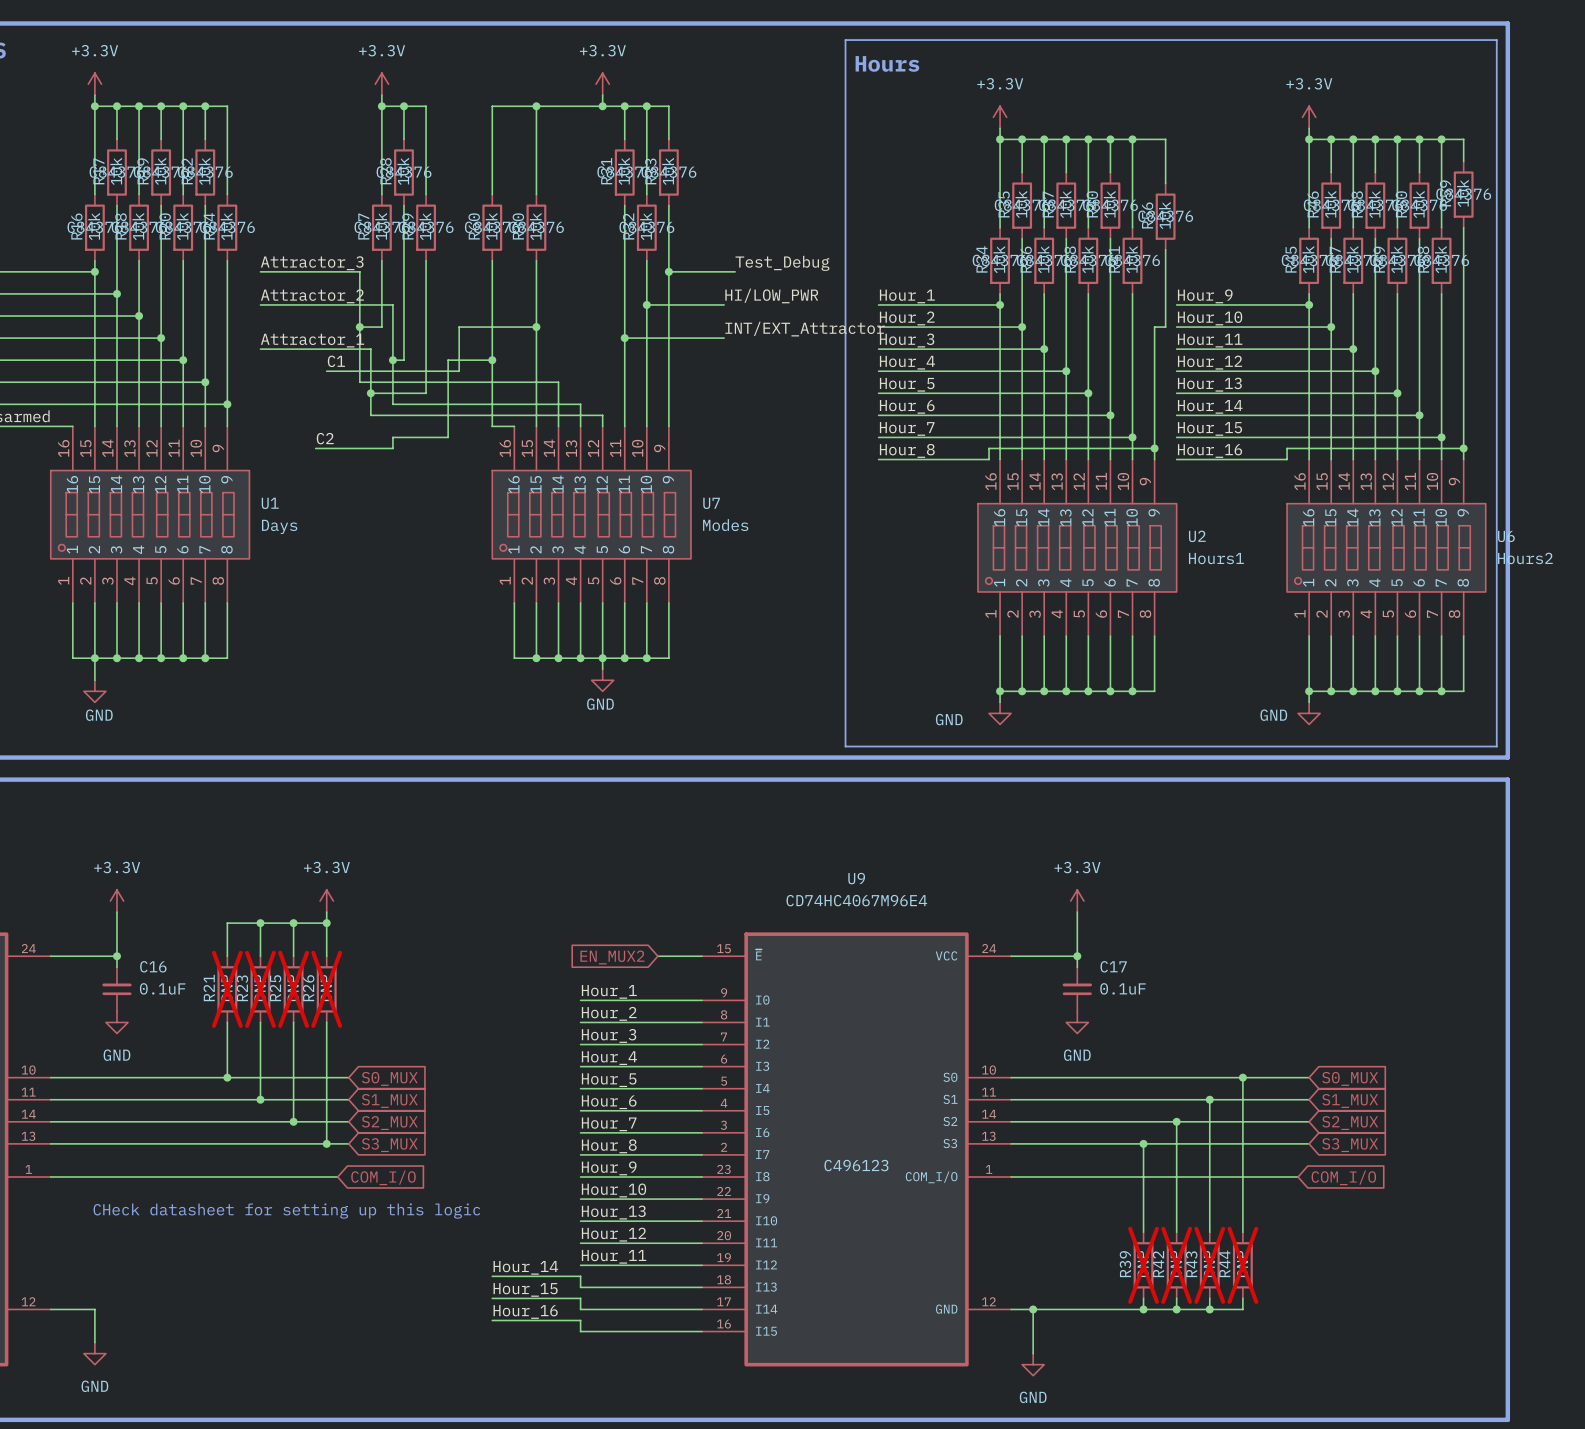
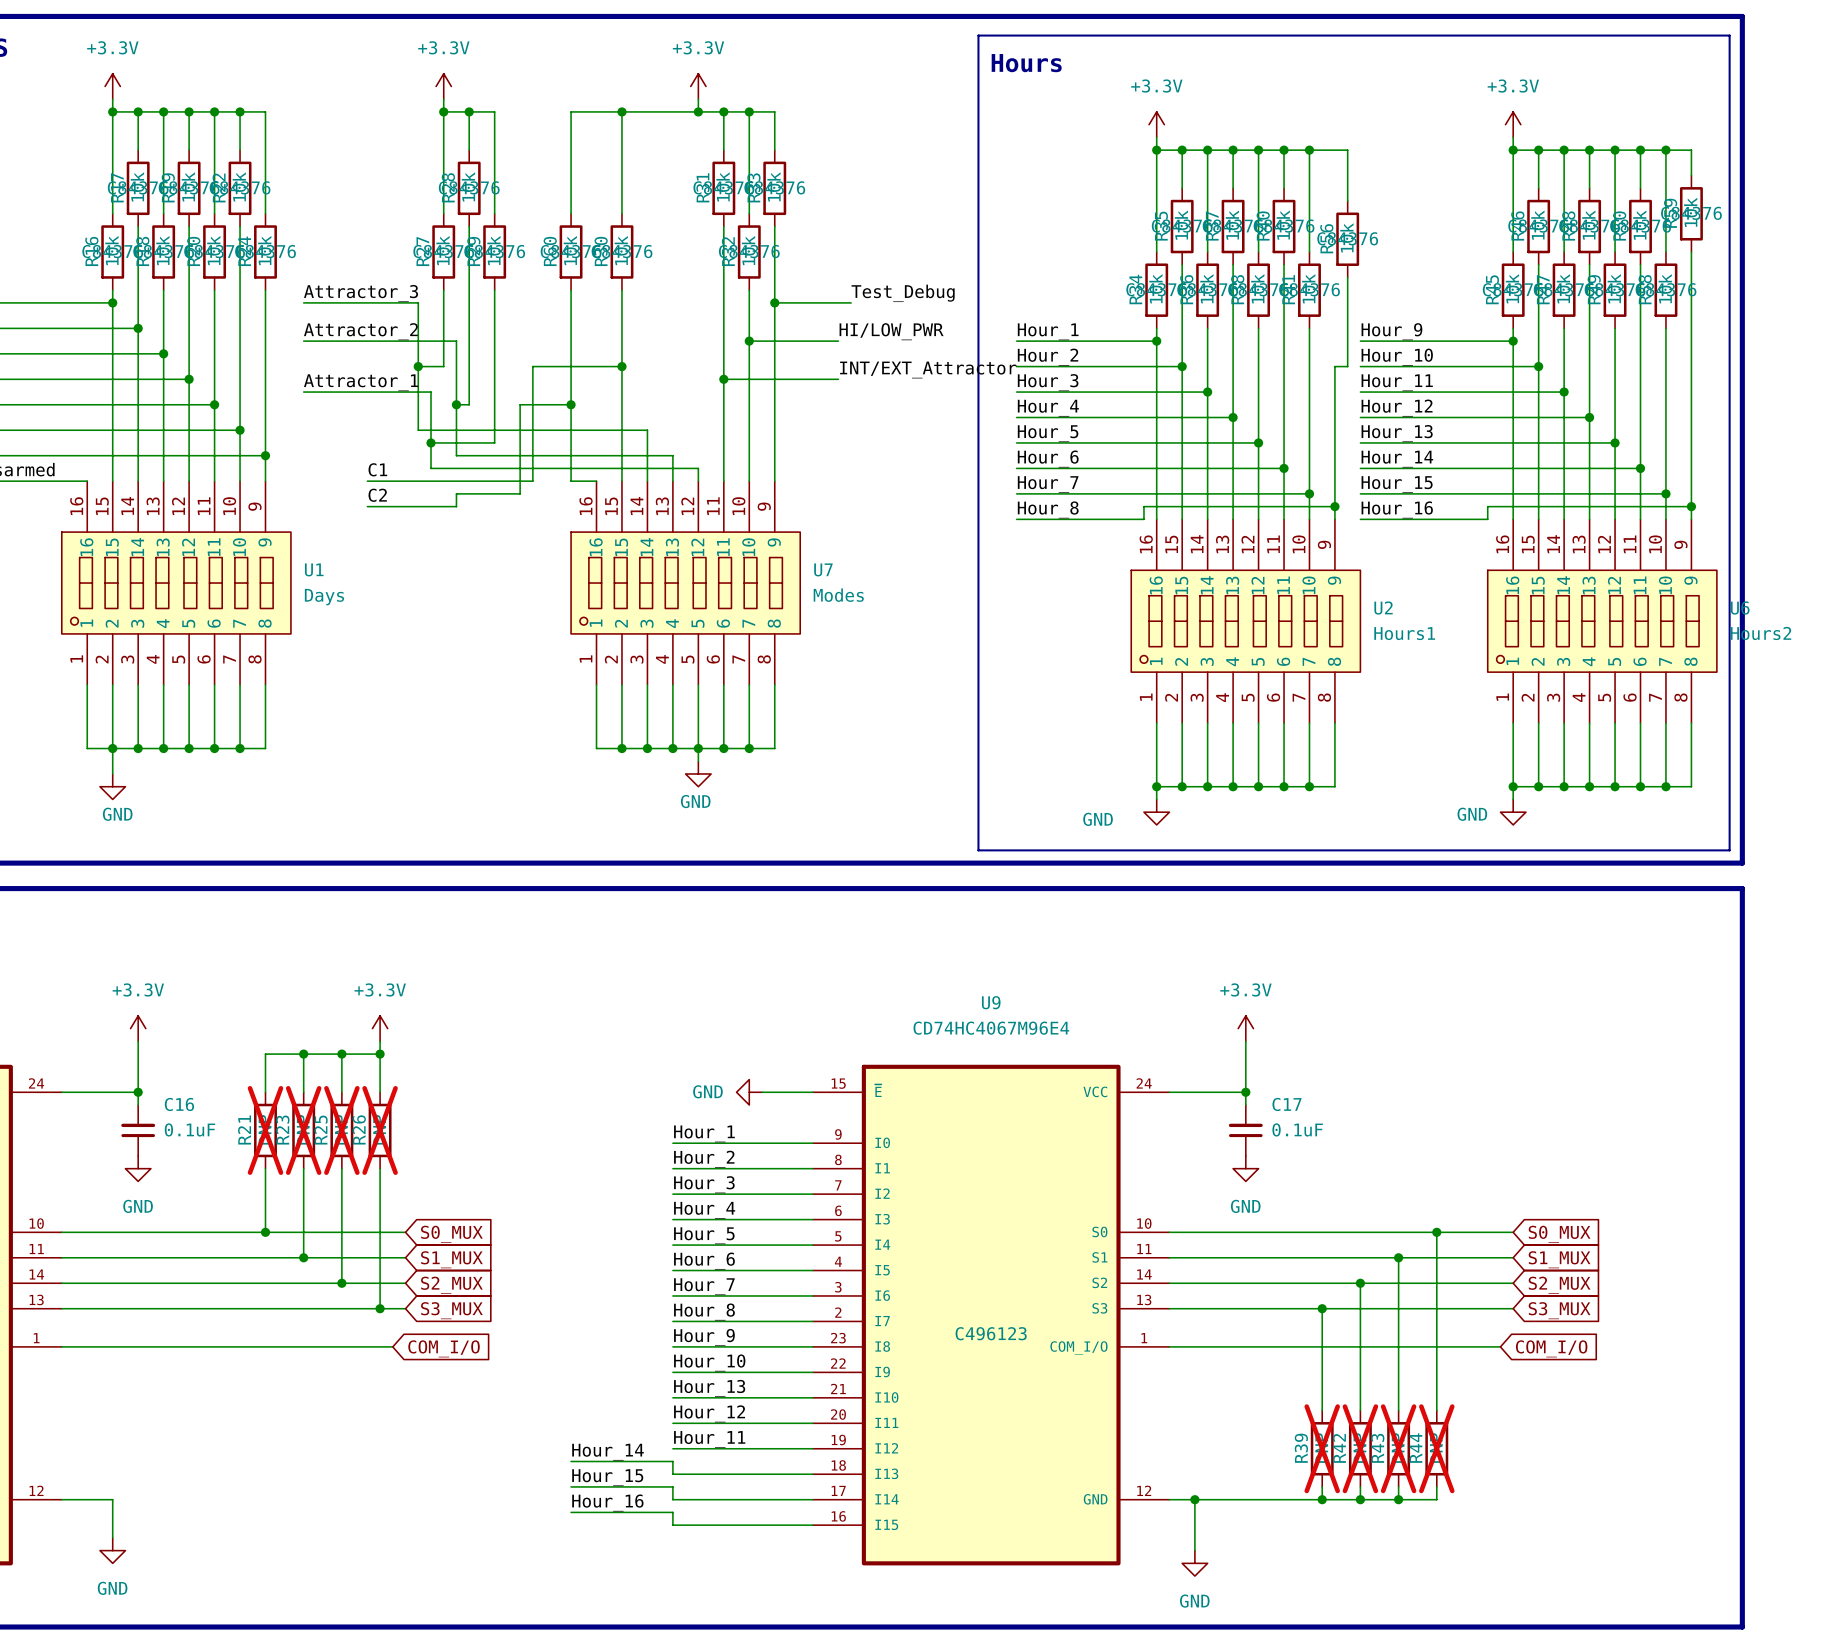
label position: C1 (336, 361) -> C1 (377, 469)
wire: (326, 371) (459, 371) -> (367, 481) (532, 481) (532, 417)
power symbol: none -> GND (749, 1092)
global label: EN_MUX2 (612, 957) -> none
text: CHeck datasheet for setting up this logic (286, 1211) -> none

